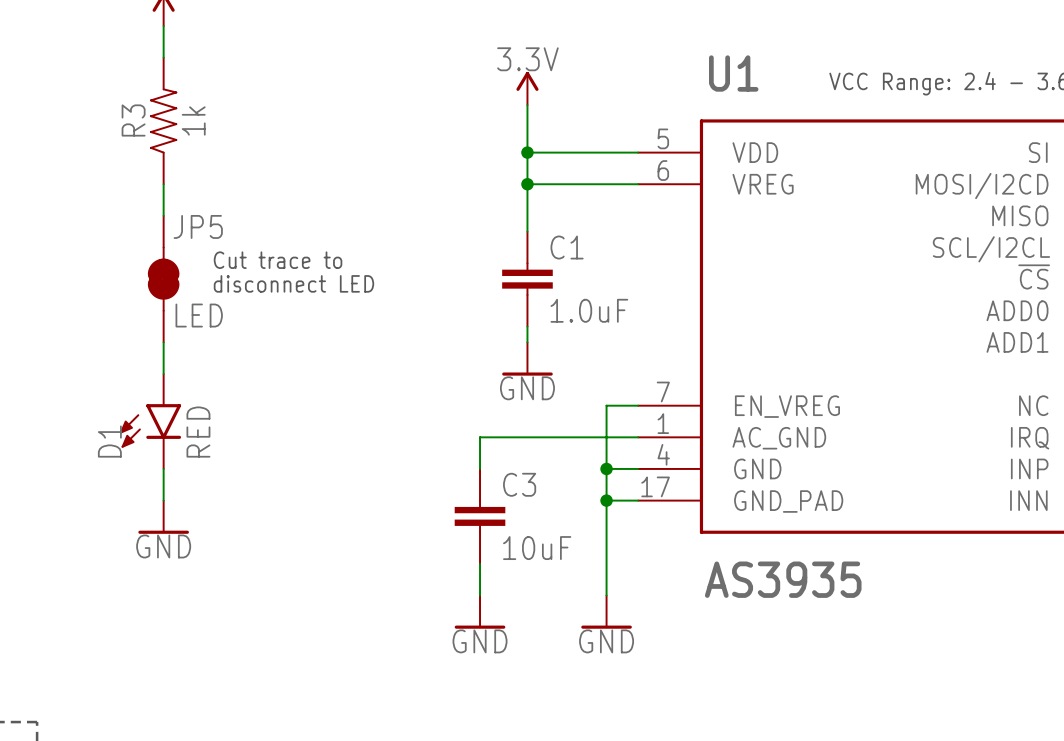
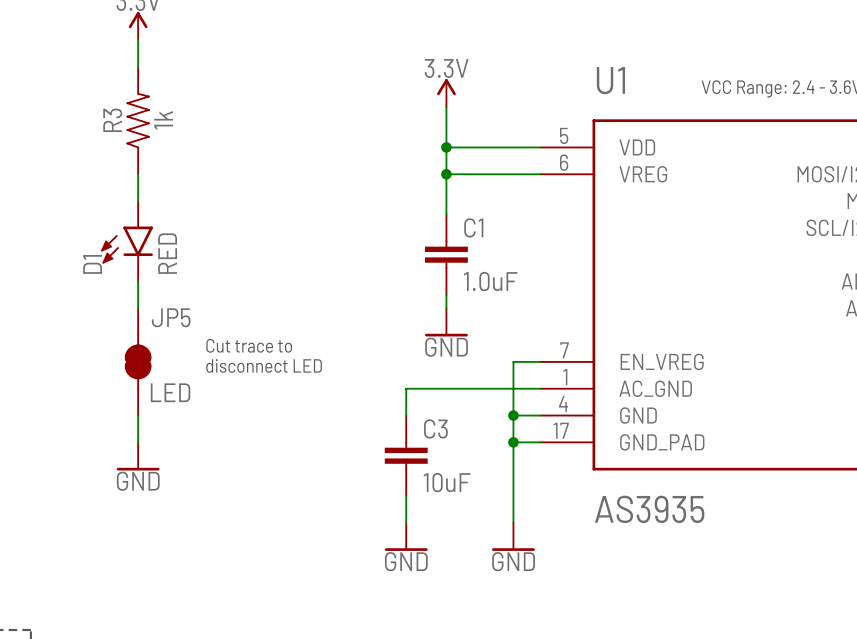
text position: Cut trace to (278, 260) -> Cut trace to (249, 345)
JP5 position: (163, 279) -> (138, 361)
text position: disconnect LED (293, 283) -> disconnect LED (264, 365)
D1 position: (150, 421) -> (127, 241)

